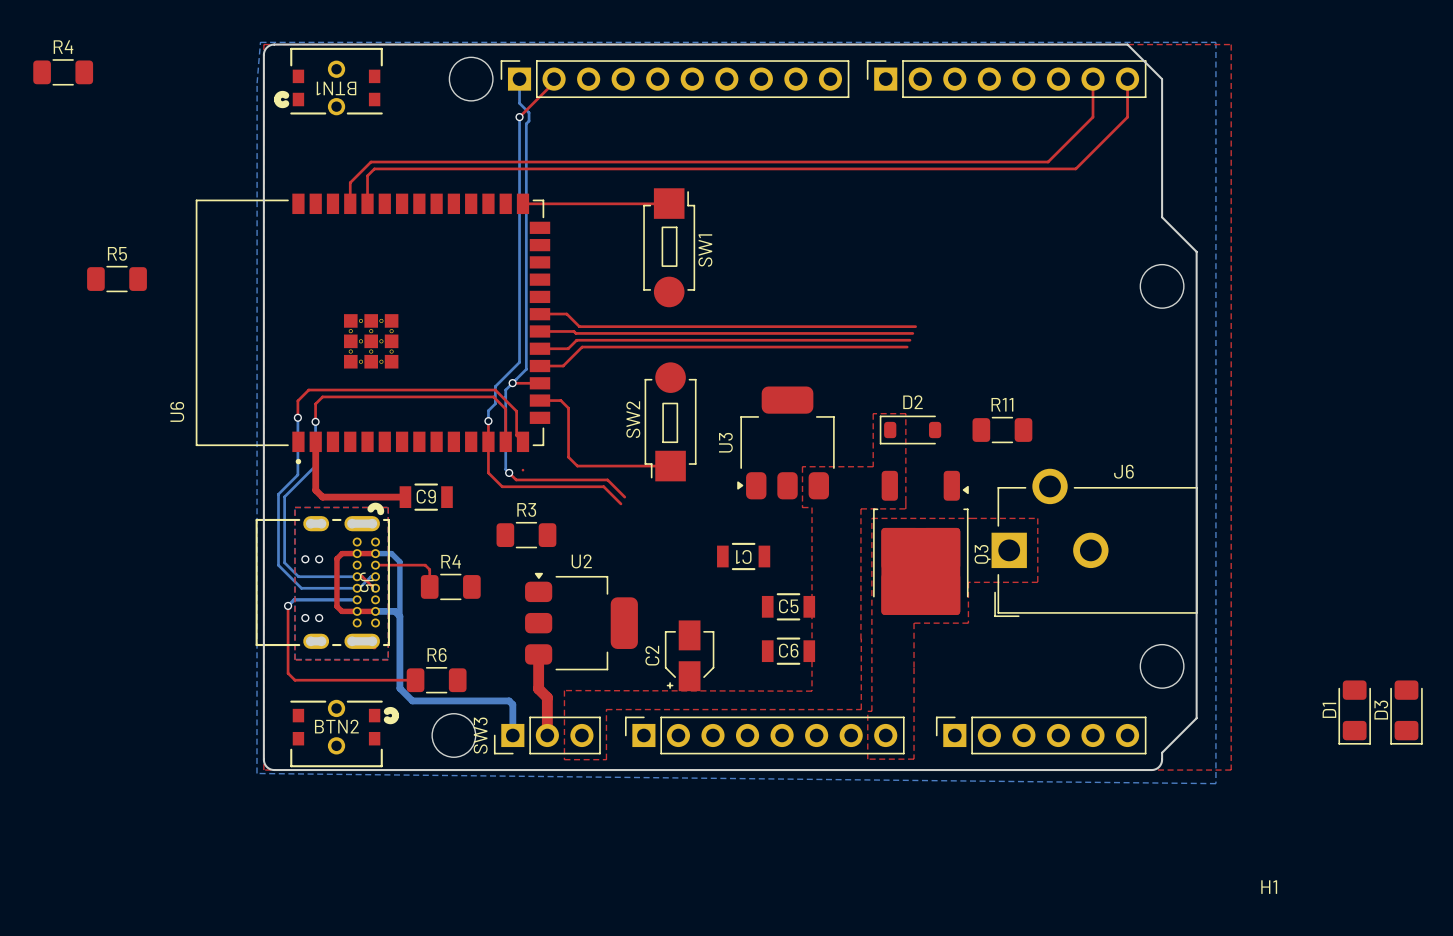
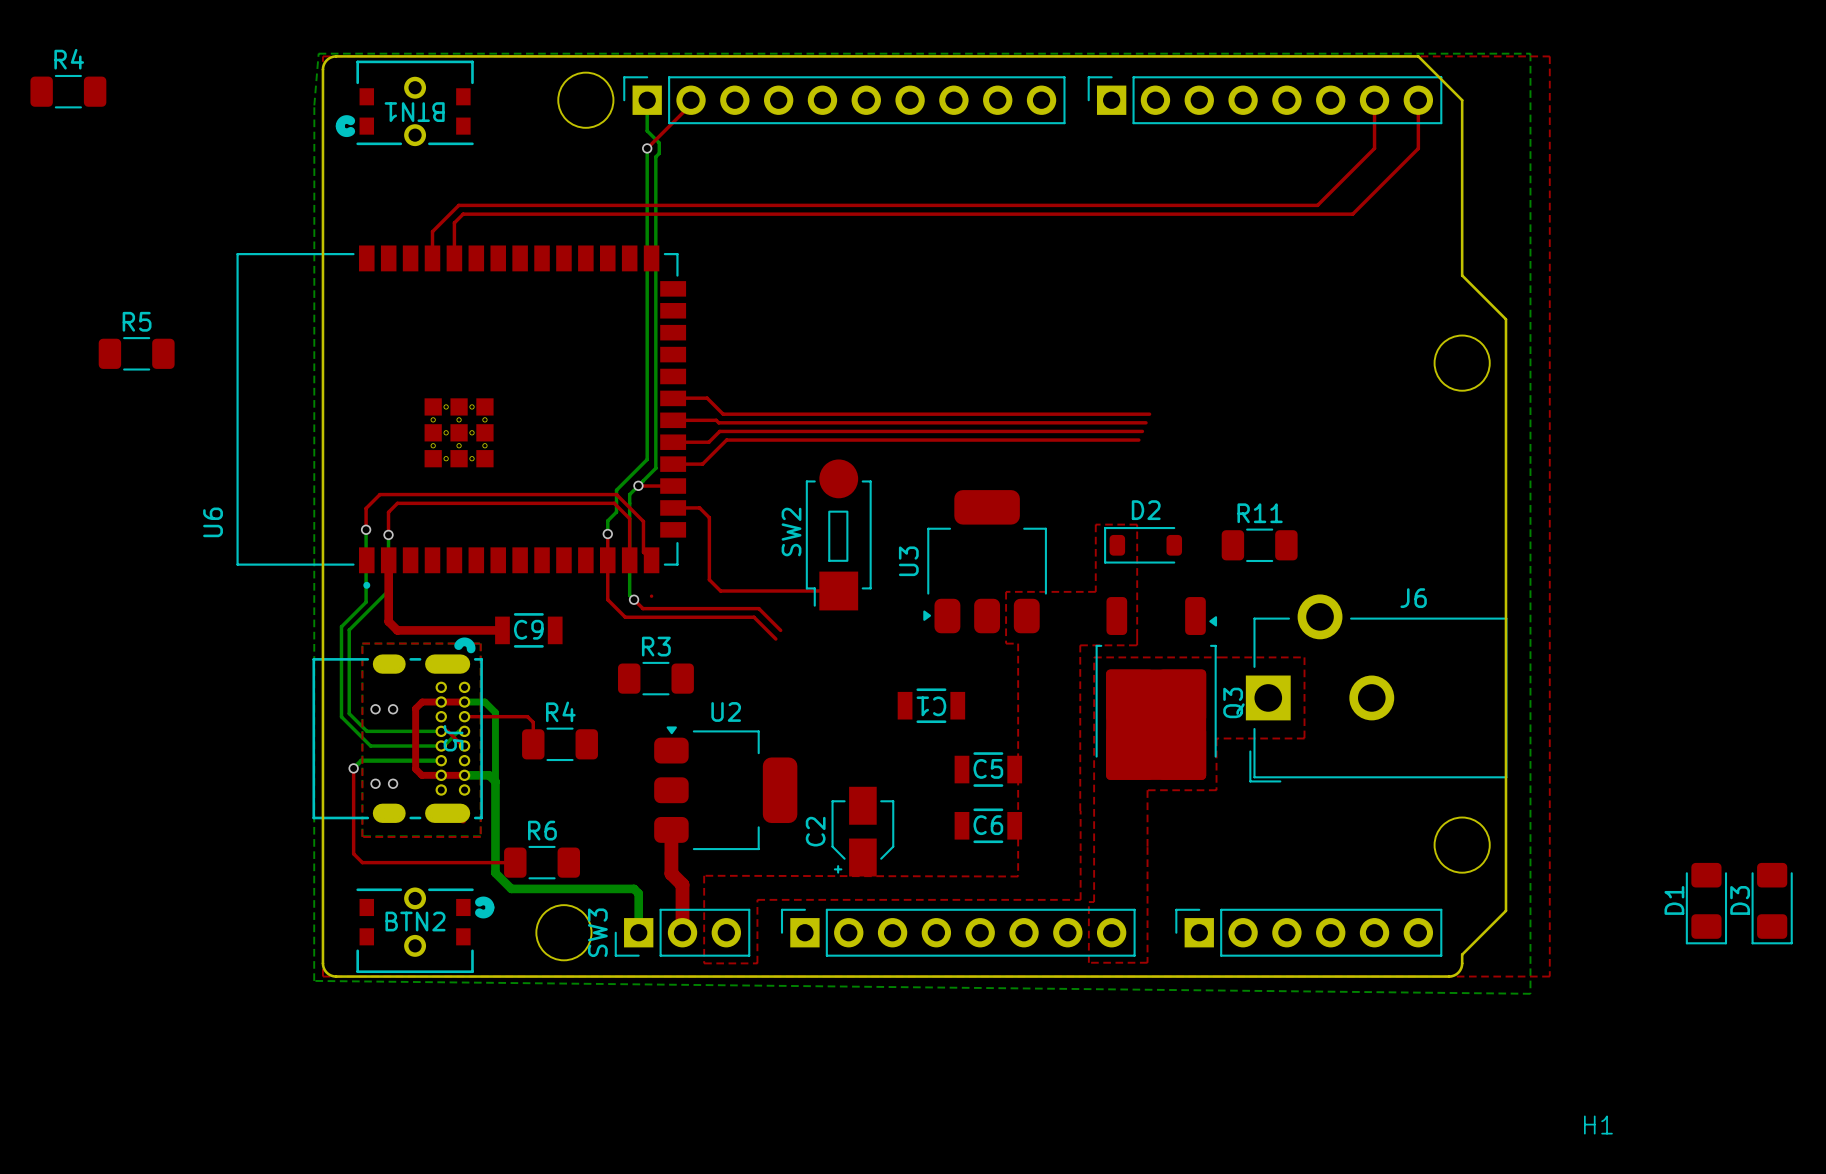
top track: (669, 203) (522, 203) -> none
SW1: (669, 247) -> none

